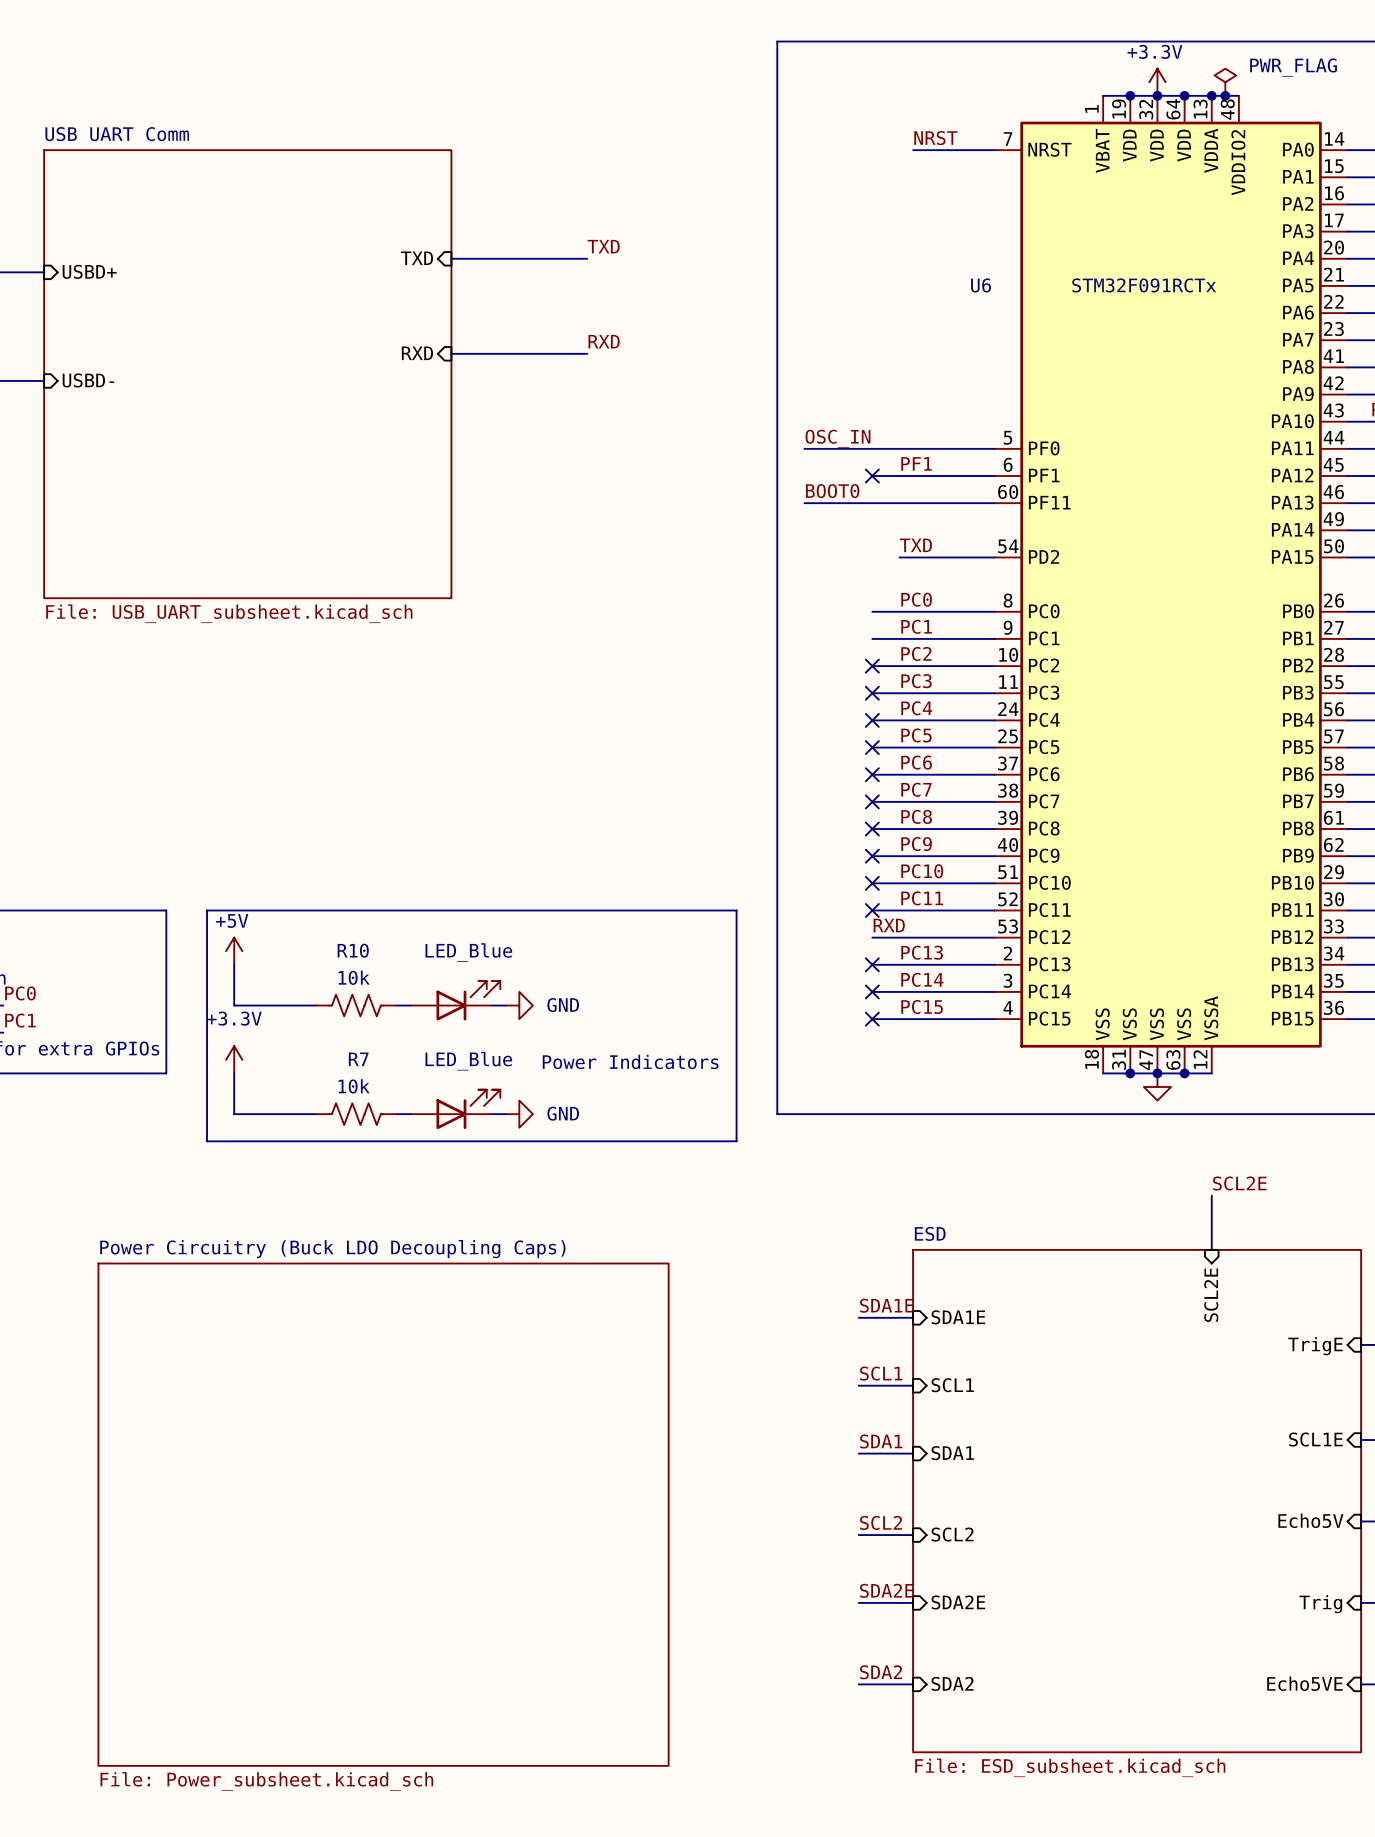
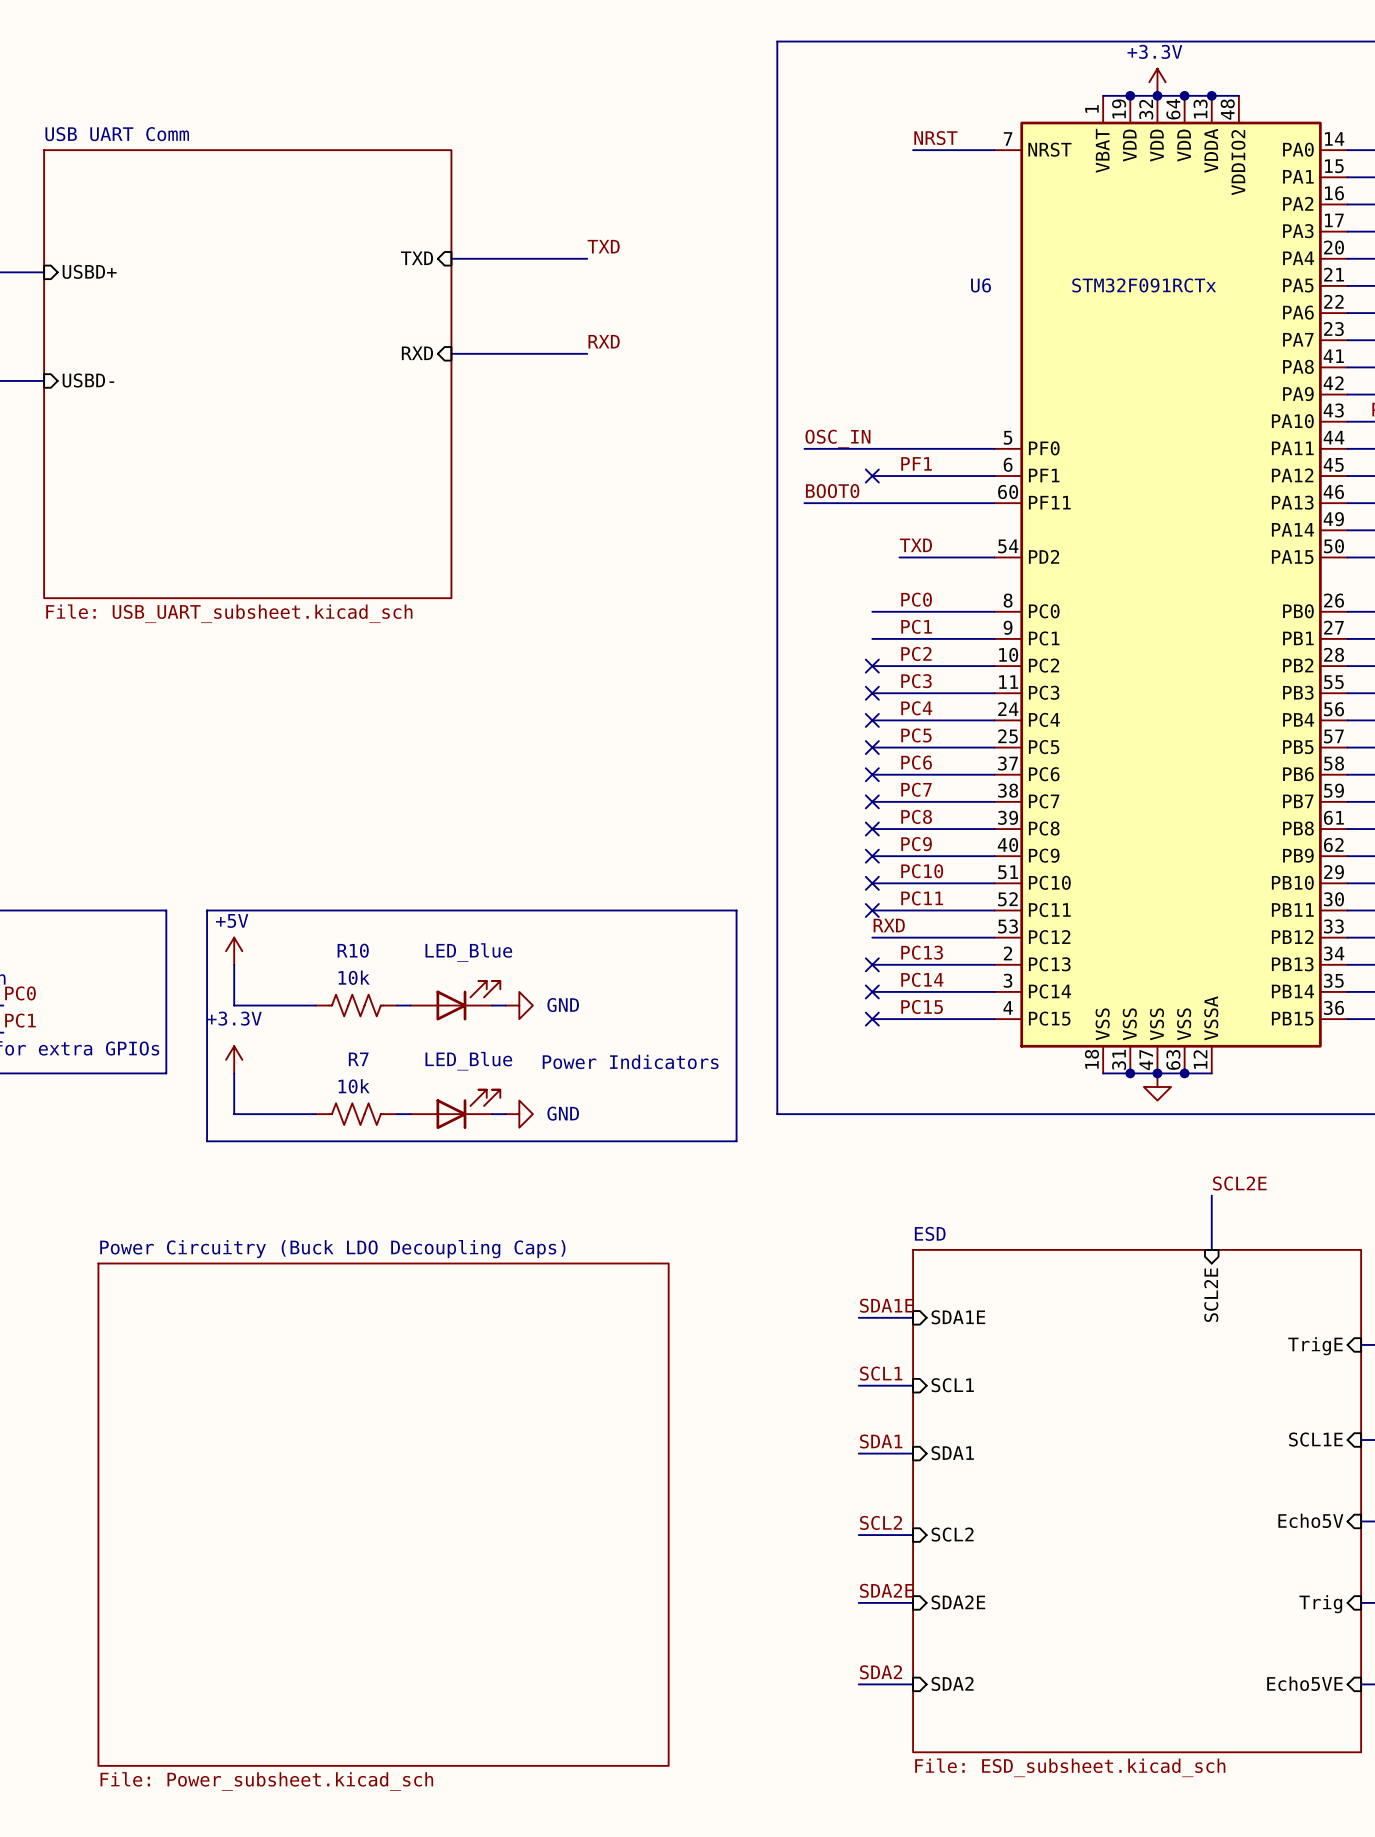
power symbol: PWR_FLAG (1225, 82) -> none
junction: (1225, 95) -> none

